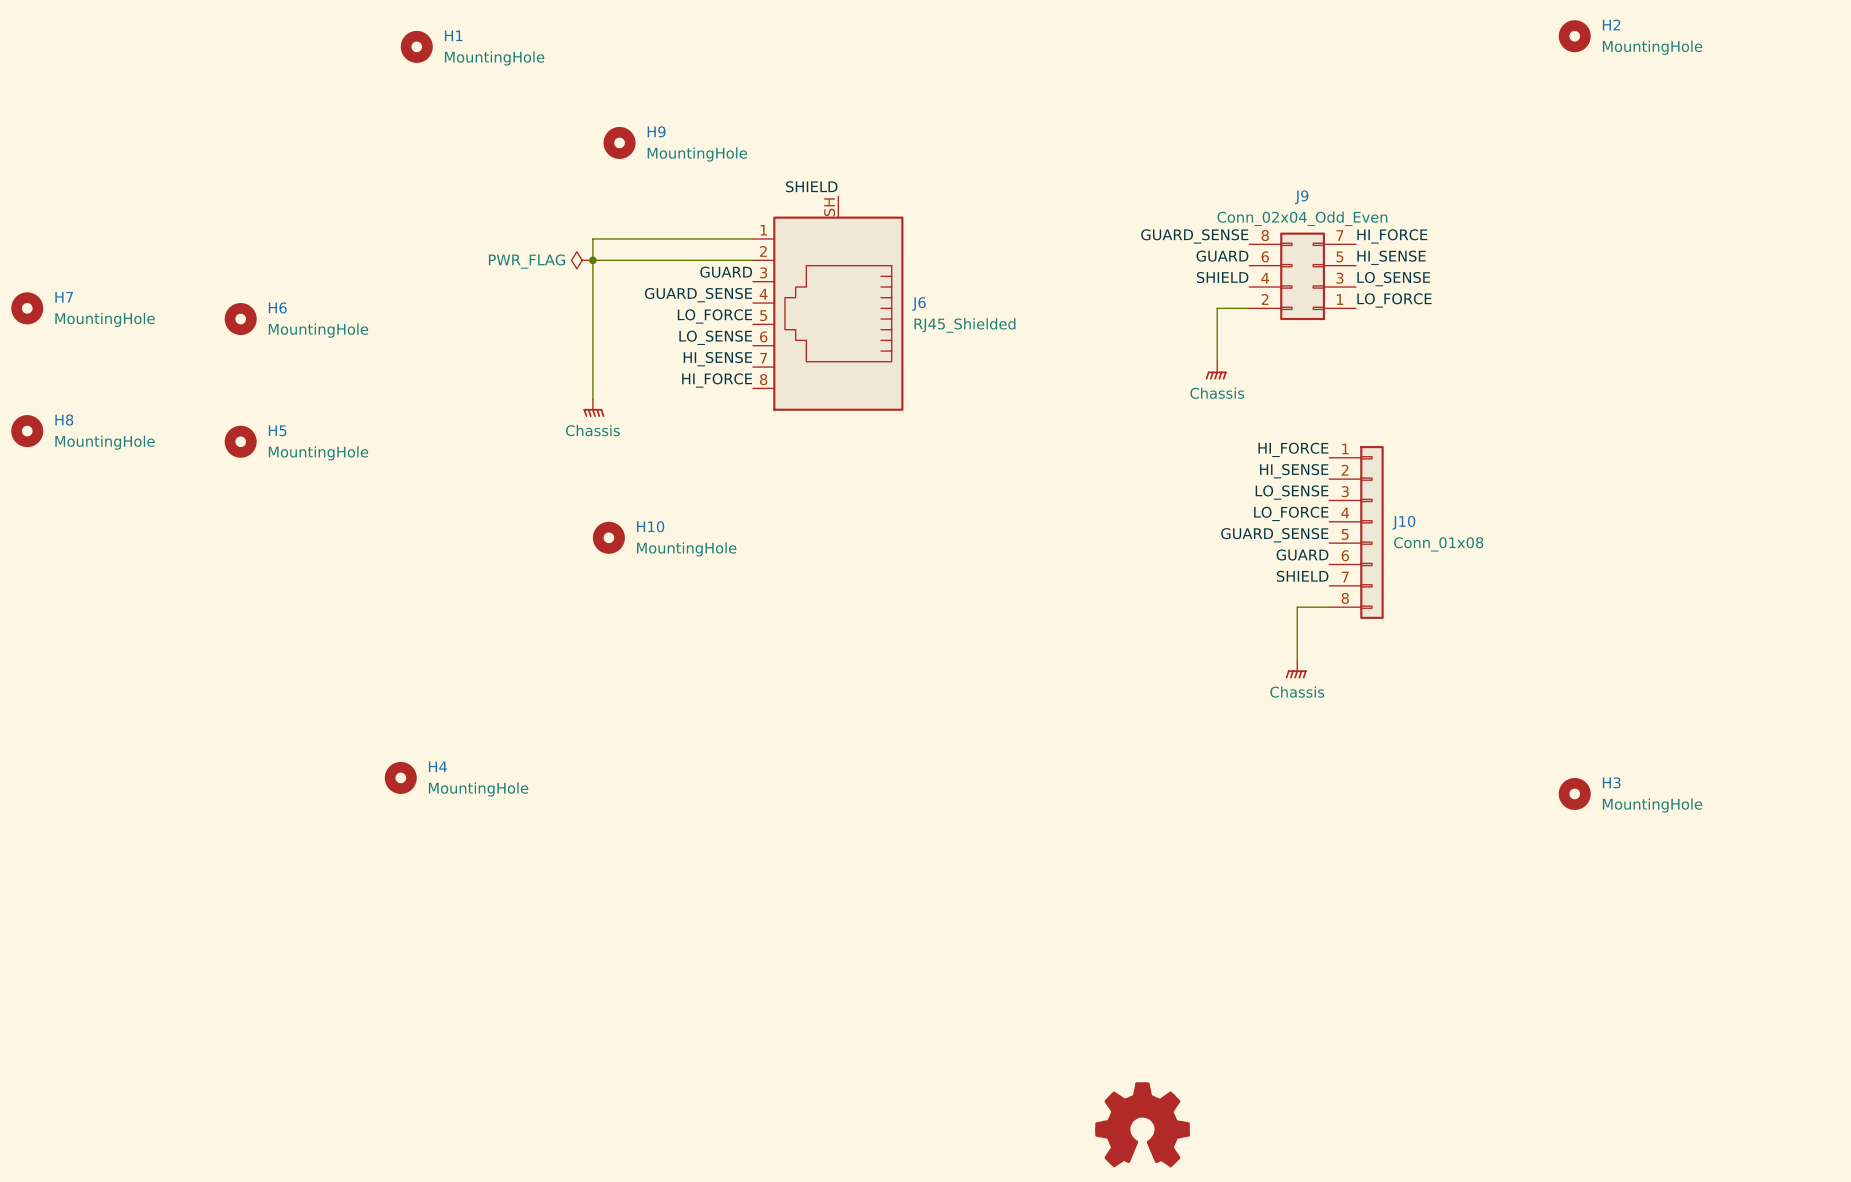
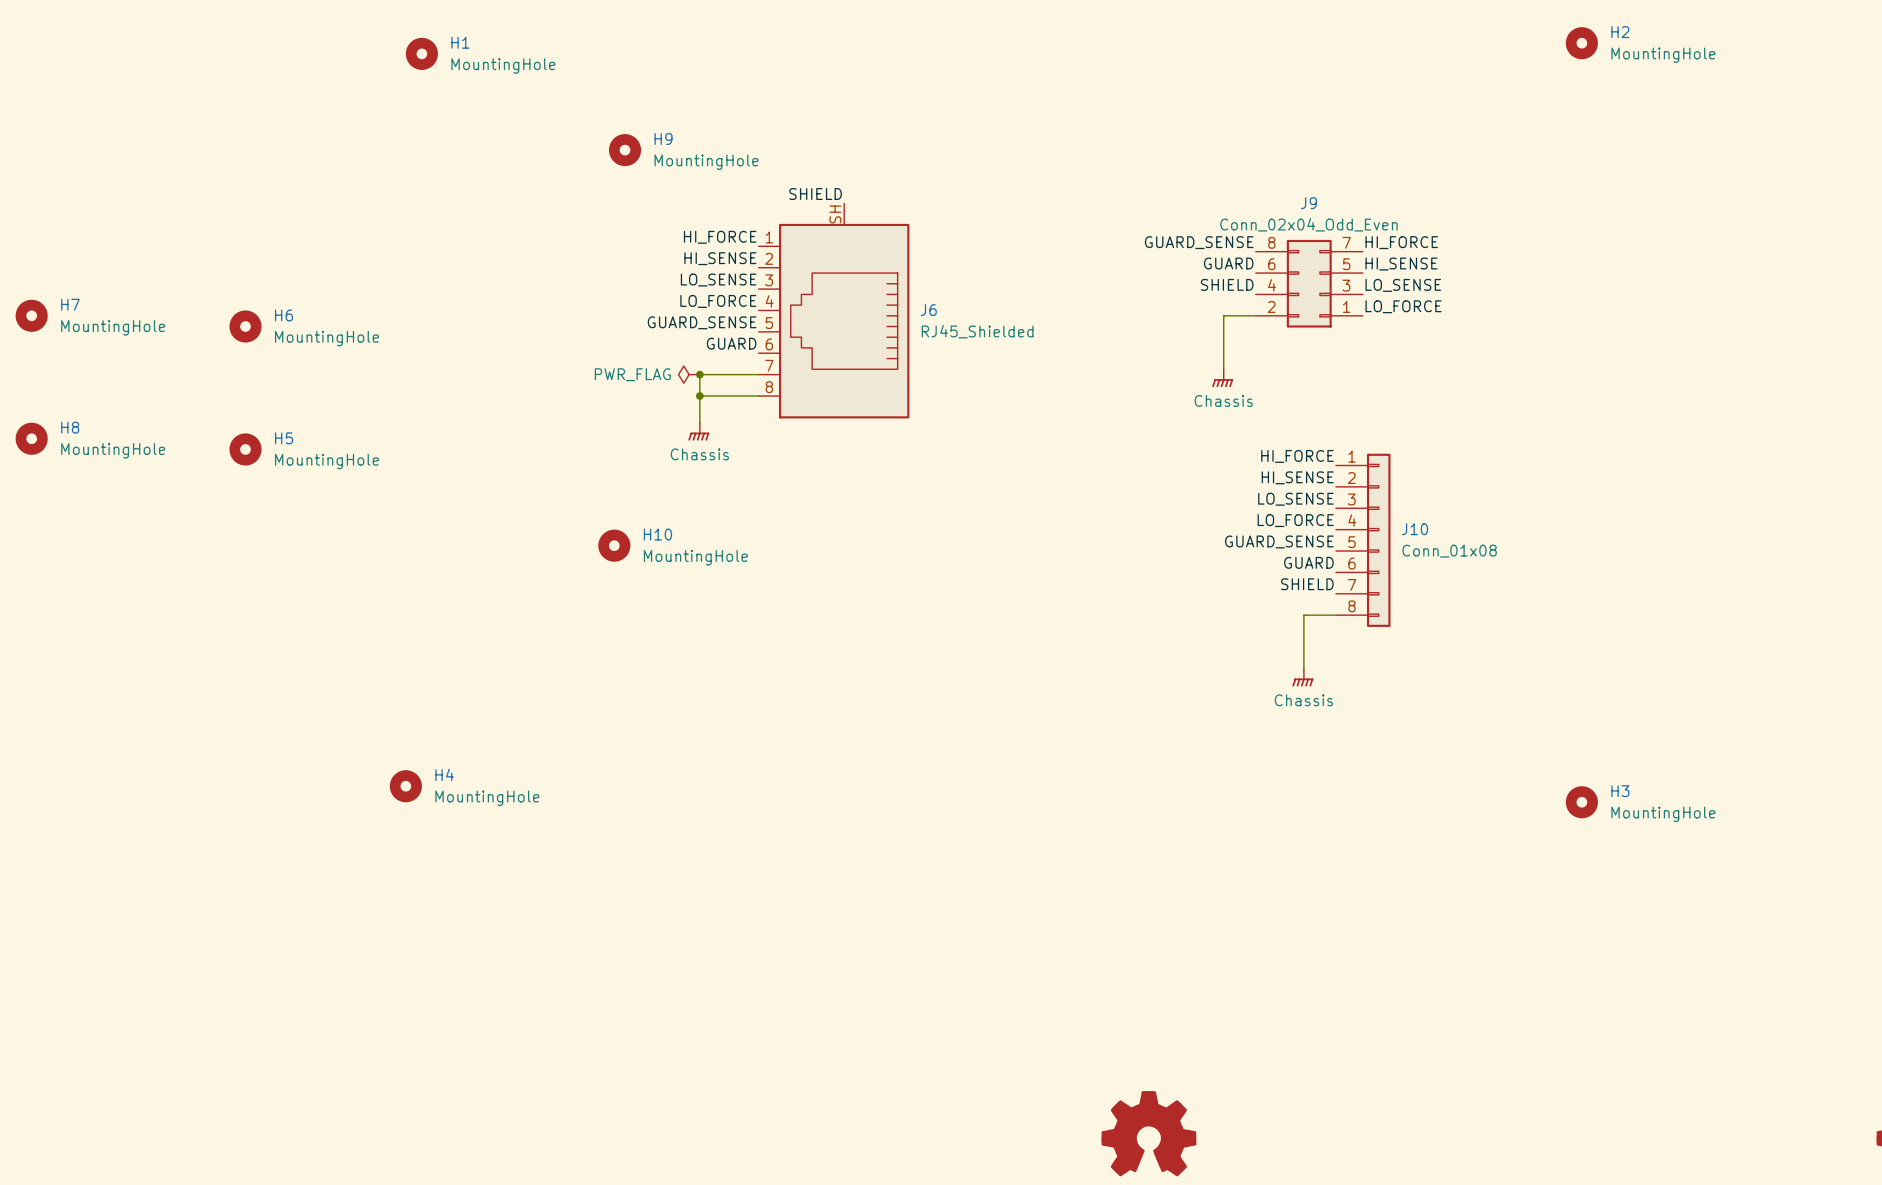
wire: (752, 238) (592, 238) (592, 399) -> none
power symbol position: PWR_FLAG (582, 260) -> PWR_FLAG (689, 374)
wire: (592, 260) (752, 260) -> none
junction: (592, 260) -> none
label: GUARD (726, 272) -> LO_SENSE (718, 280)
label: GUARD_SENSE (698, 295) -> LO_FORCE (718, 301)
label: LO_FORCE (714, 316) -> GUARD_SENSE (702, 322)
label: LO_SENSE (715, 337) -> GUARD (731, 343)
label position: HI_SENSE (717, 359) -> HI_SENSE (720, 258)
junction: none -> (699, 374)
wire: none -> (758, 374) (699, 374) (699, 422)
label position: HI_FORCE (717, 380) -> HI_FORCE (720, 237)
wire: none -> (699, 395) (758, 395)
junction: none -> (699, 395)
power symbol: (593, 408) -> none
power symbol: none -> (698, 431)

